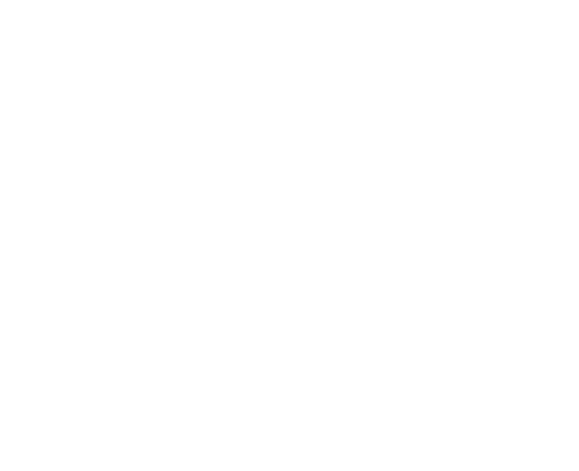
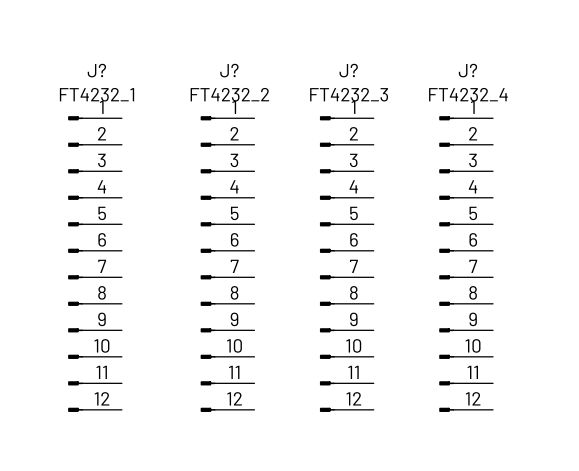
J?: none -> FT4232_1 (95, 264)
J?: none -> FT4232_2 (227, 264)
J?: none -> FT4232_3 (346, 264)
J?: none -> FT4232_4 (466, 264)

